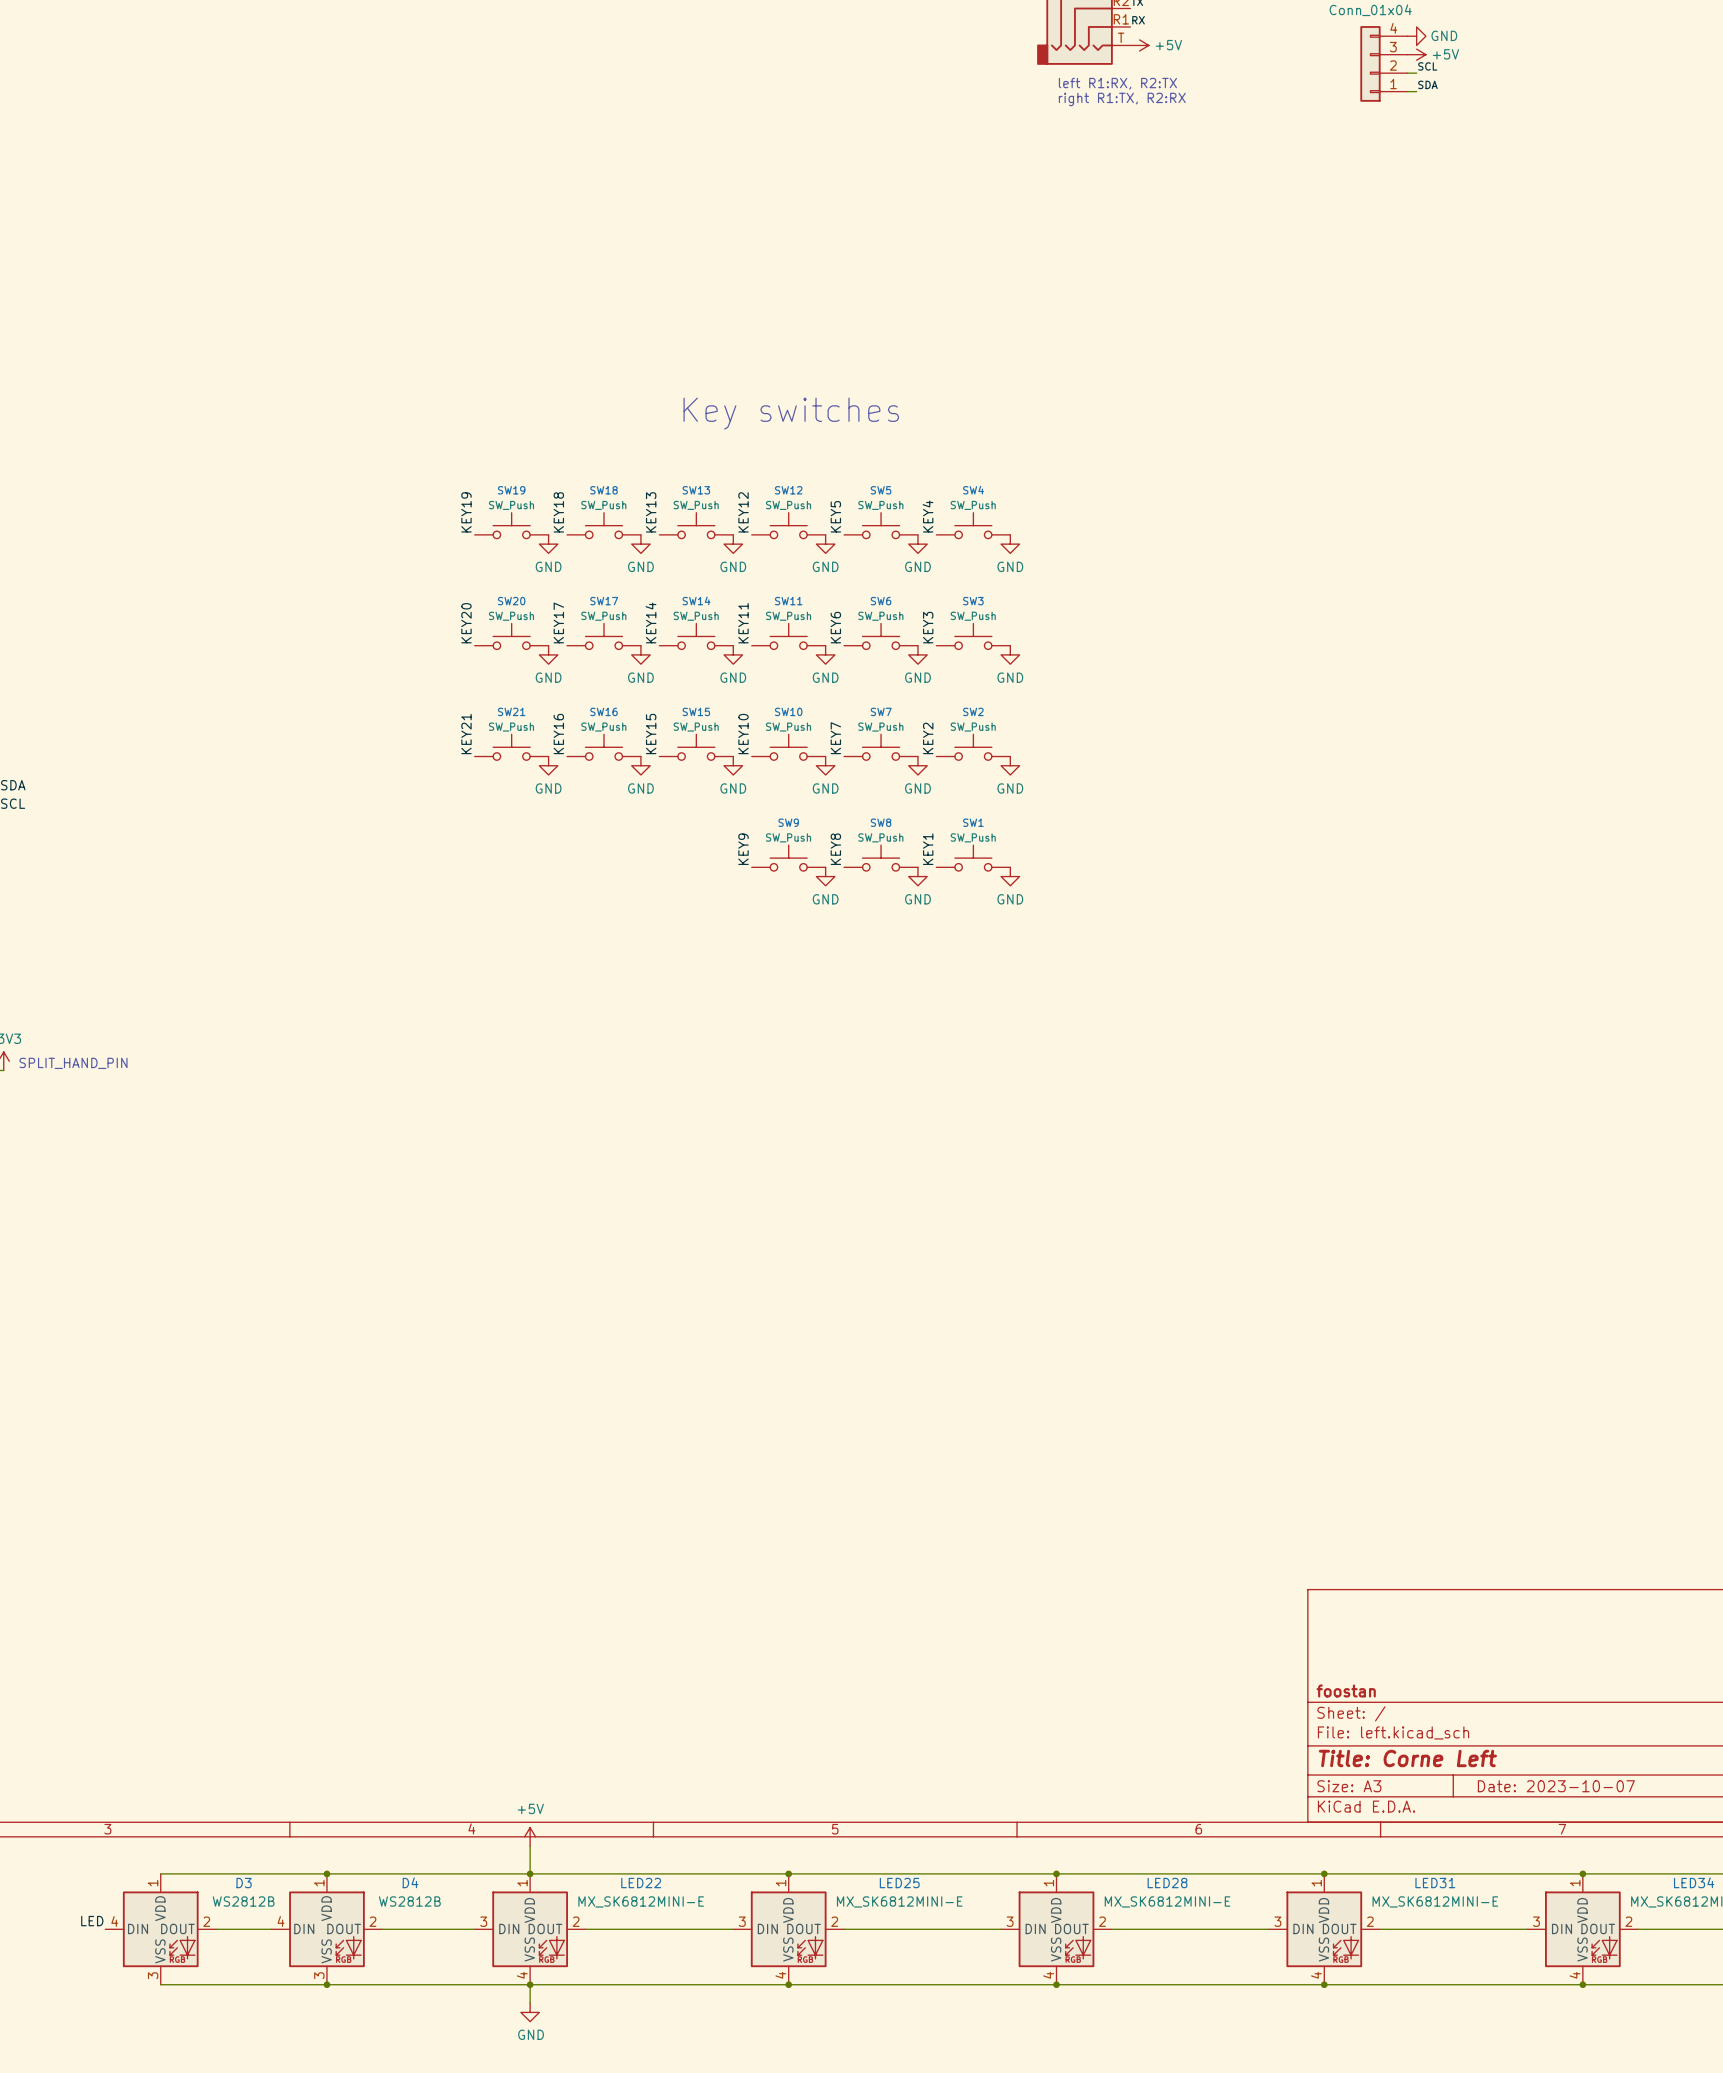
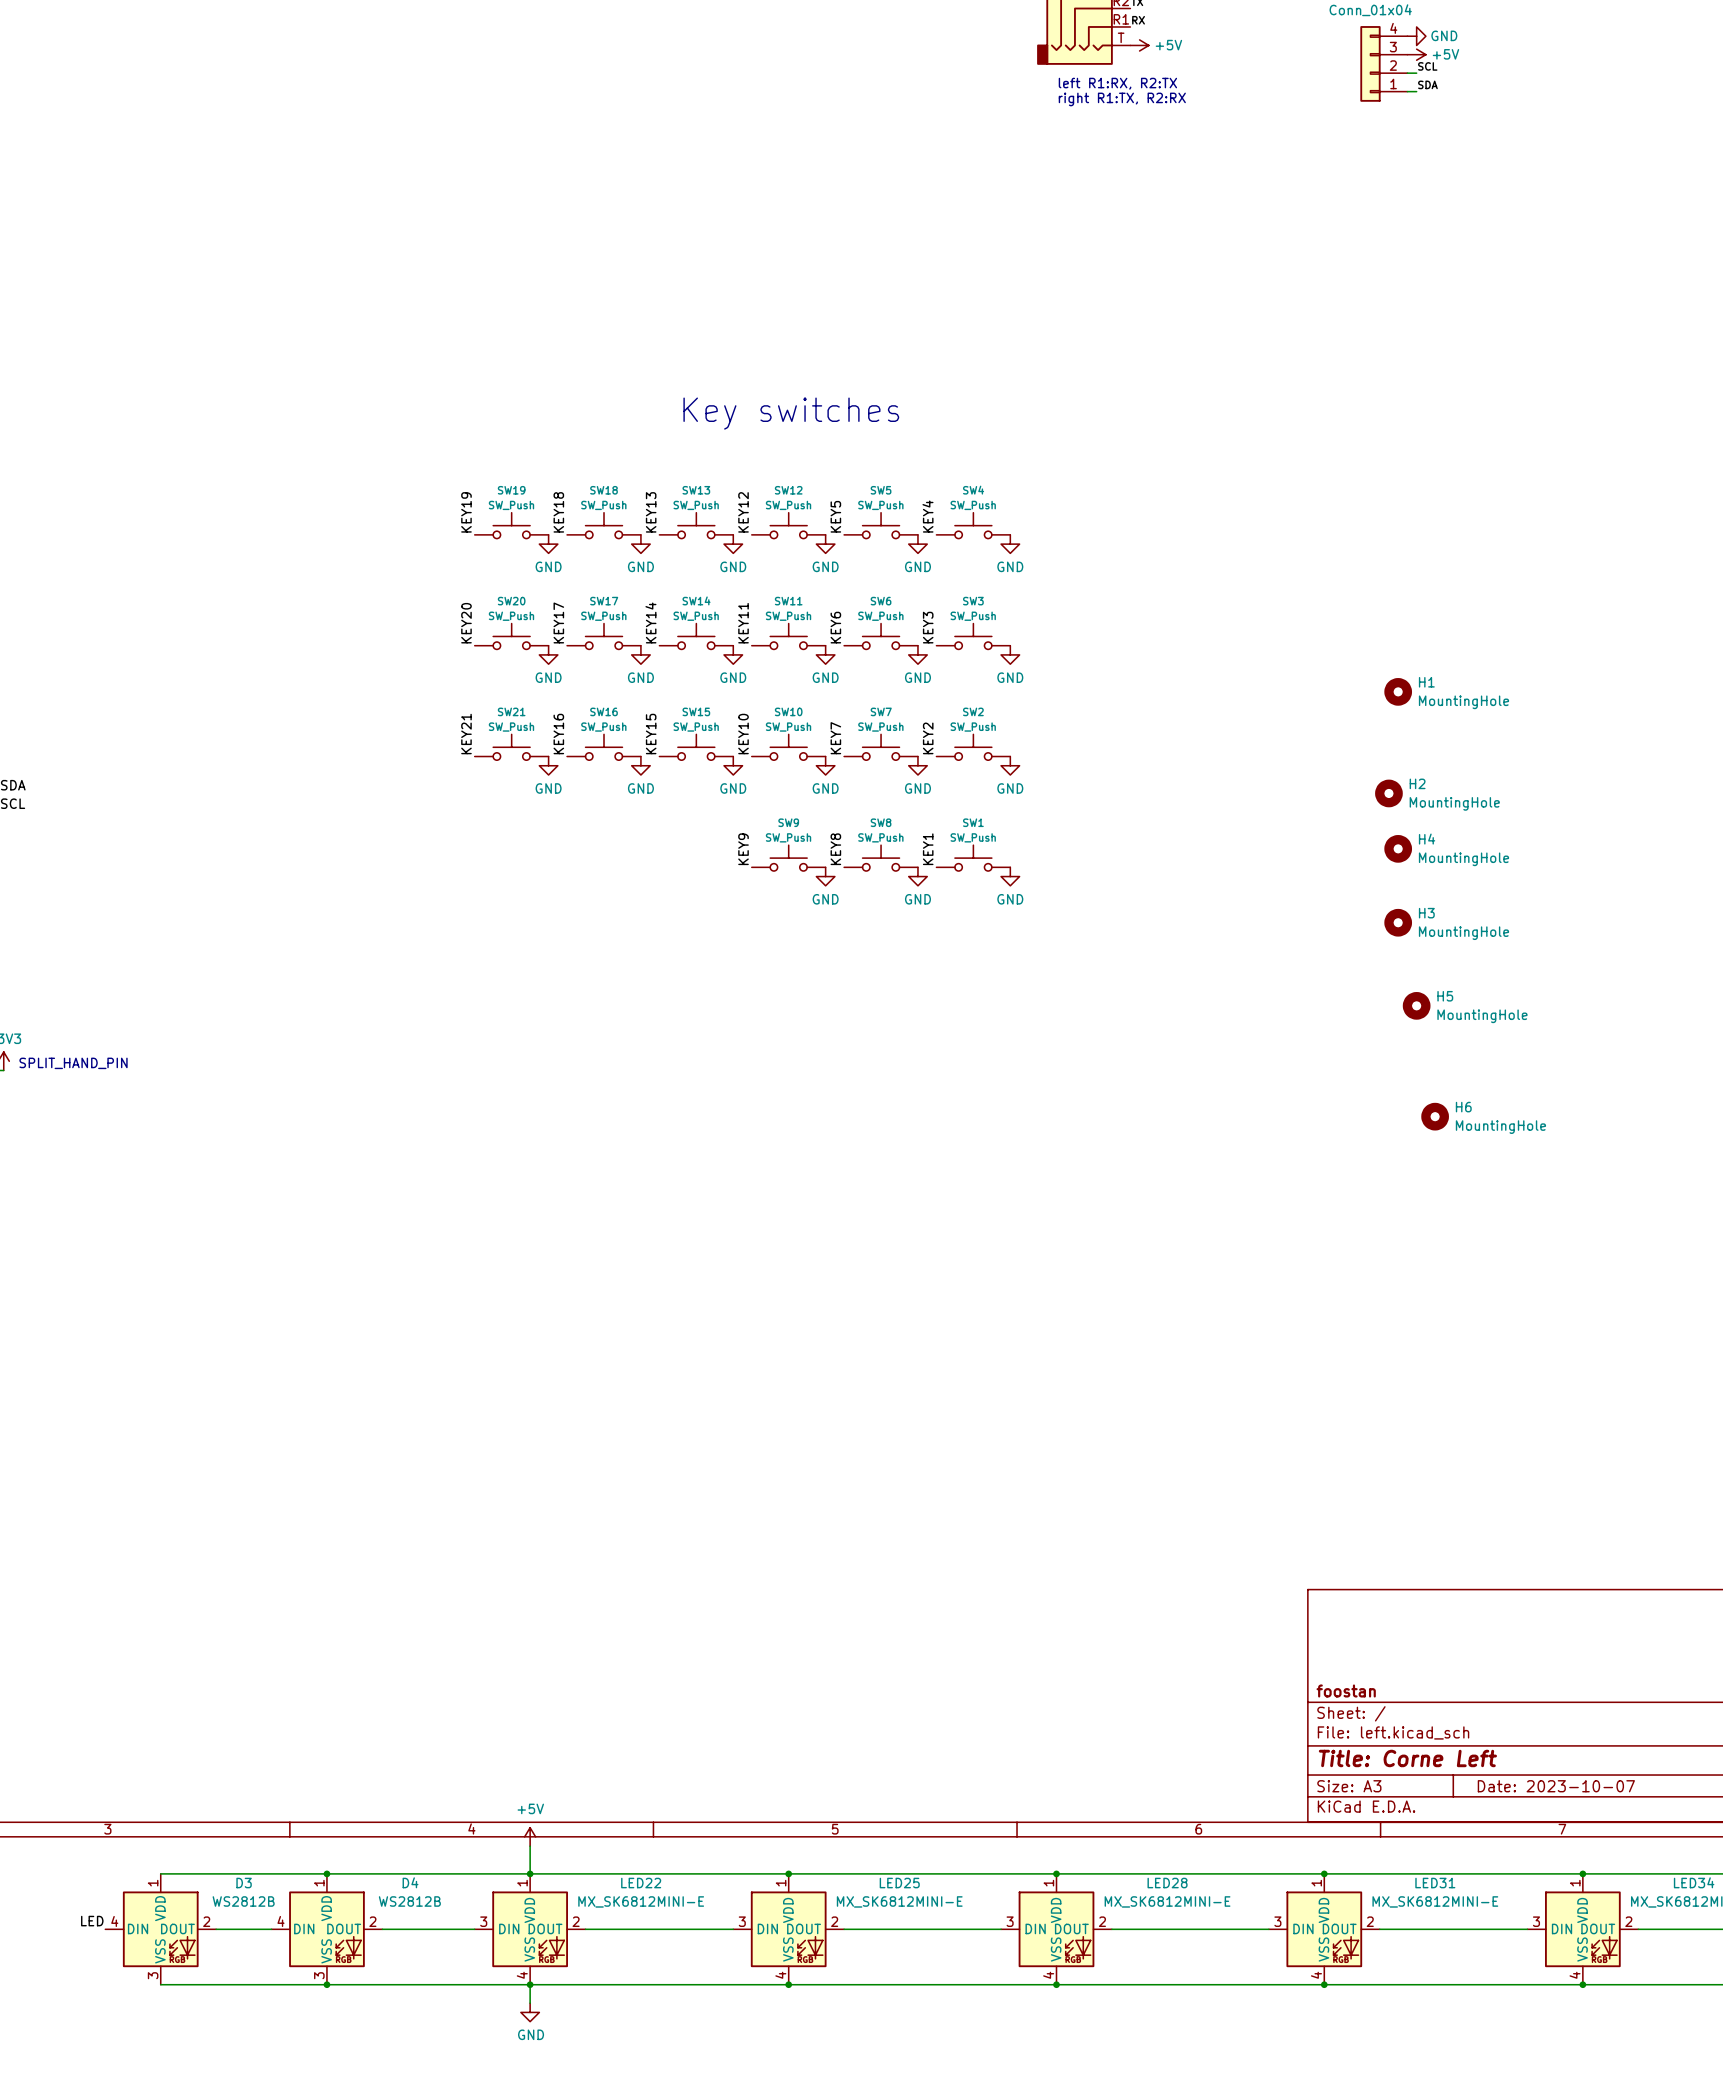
H1: none -> MountingHole (1398, 691)
H2: none -> MountingHole (1388, 793)
H4: none -> MountingHole (1398, 848)
H3: none -> MountingHole (1398, 922)
H5: none -> MountingHole (1416, 1005)
H6: none -> MountingHole (1435, 1116)

